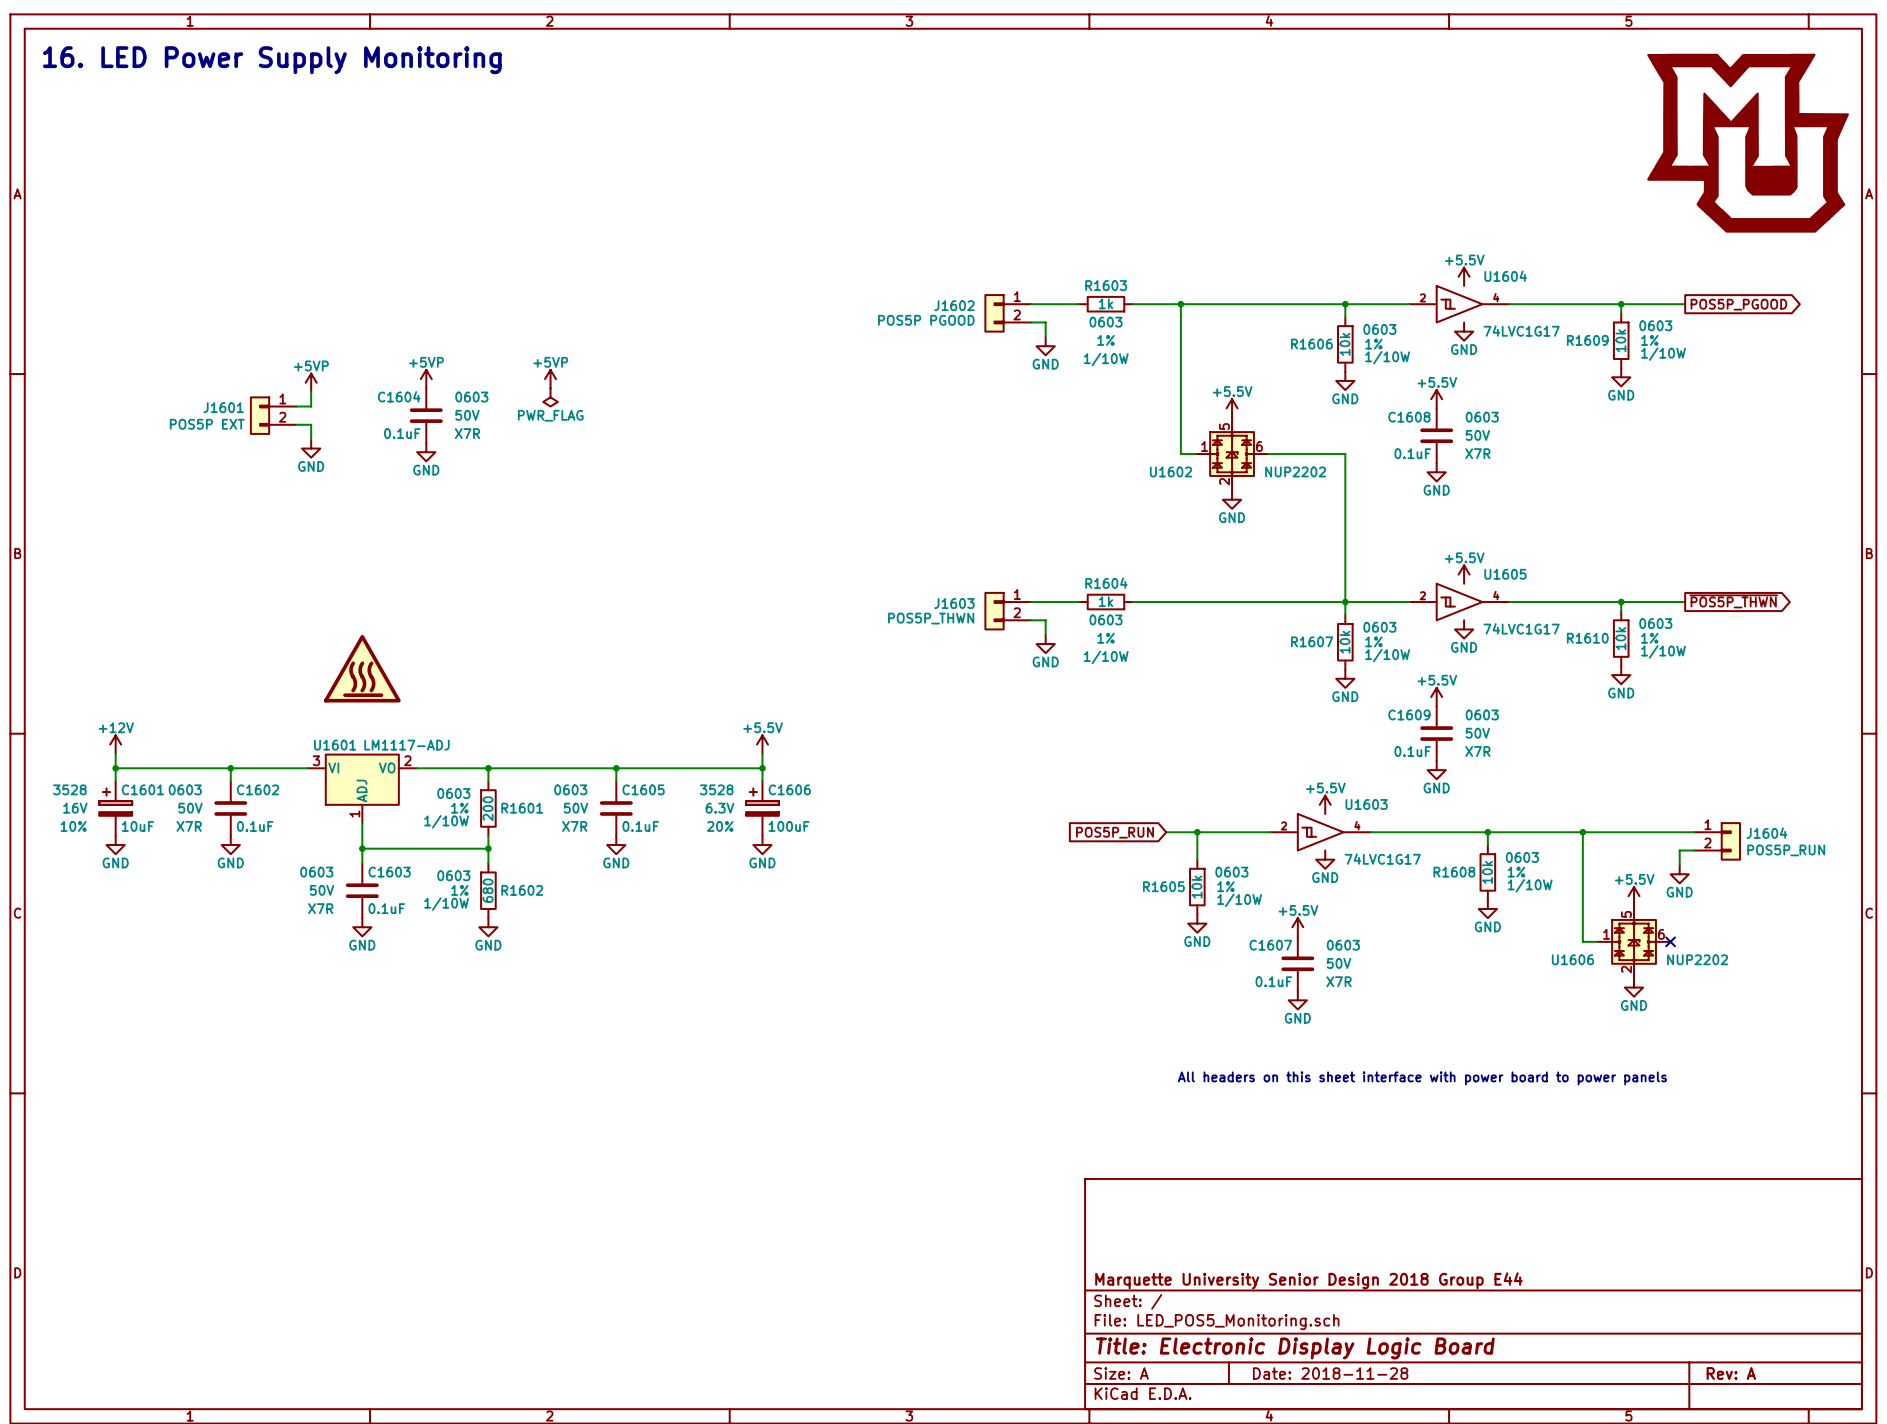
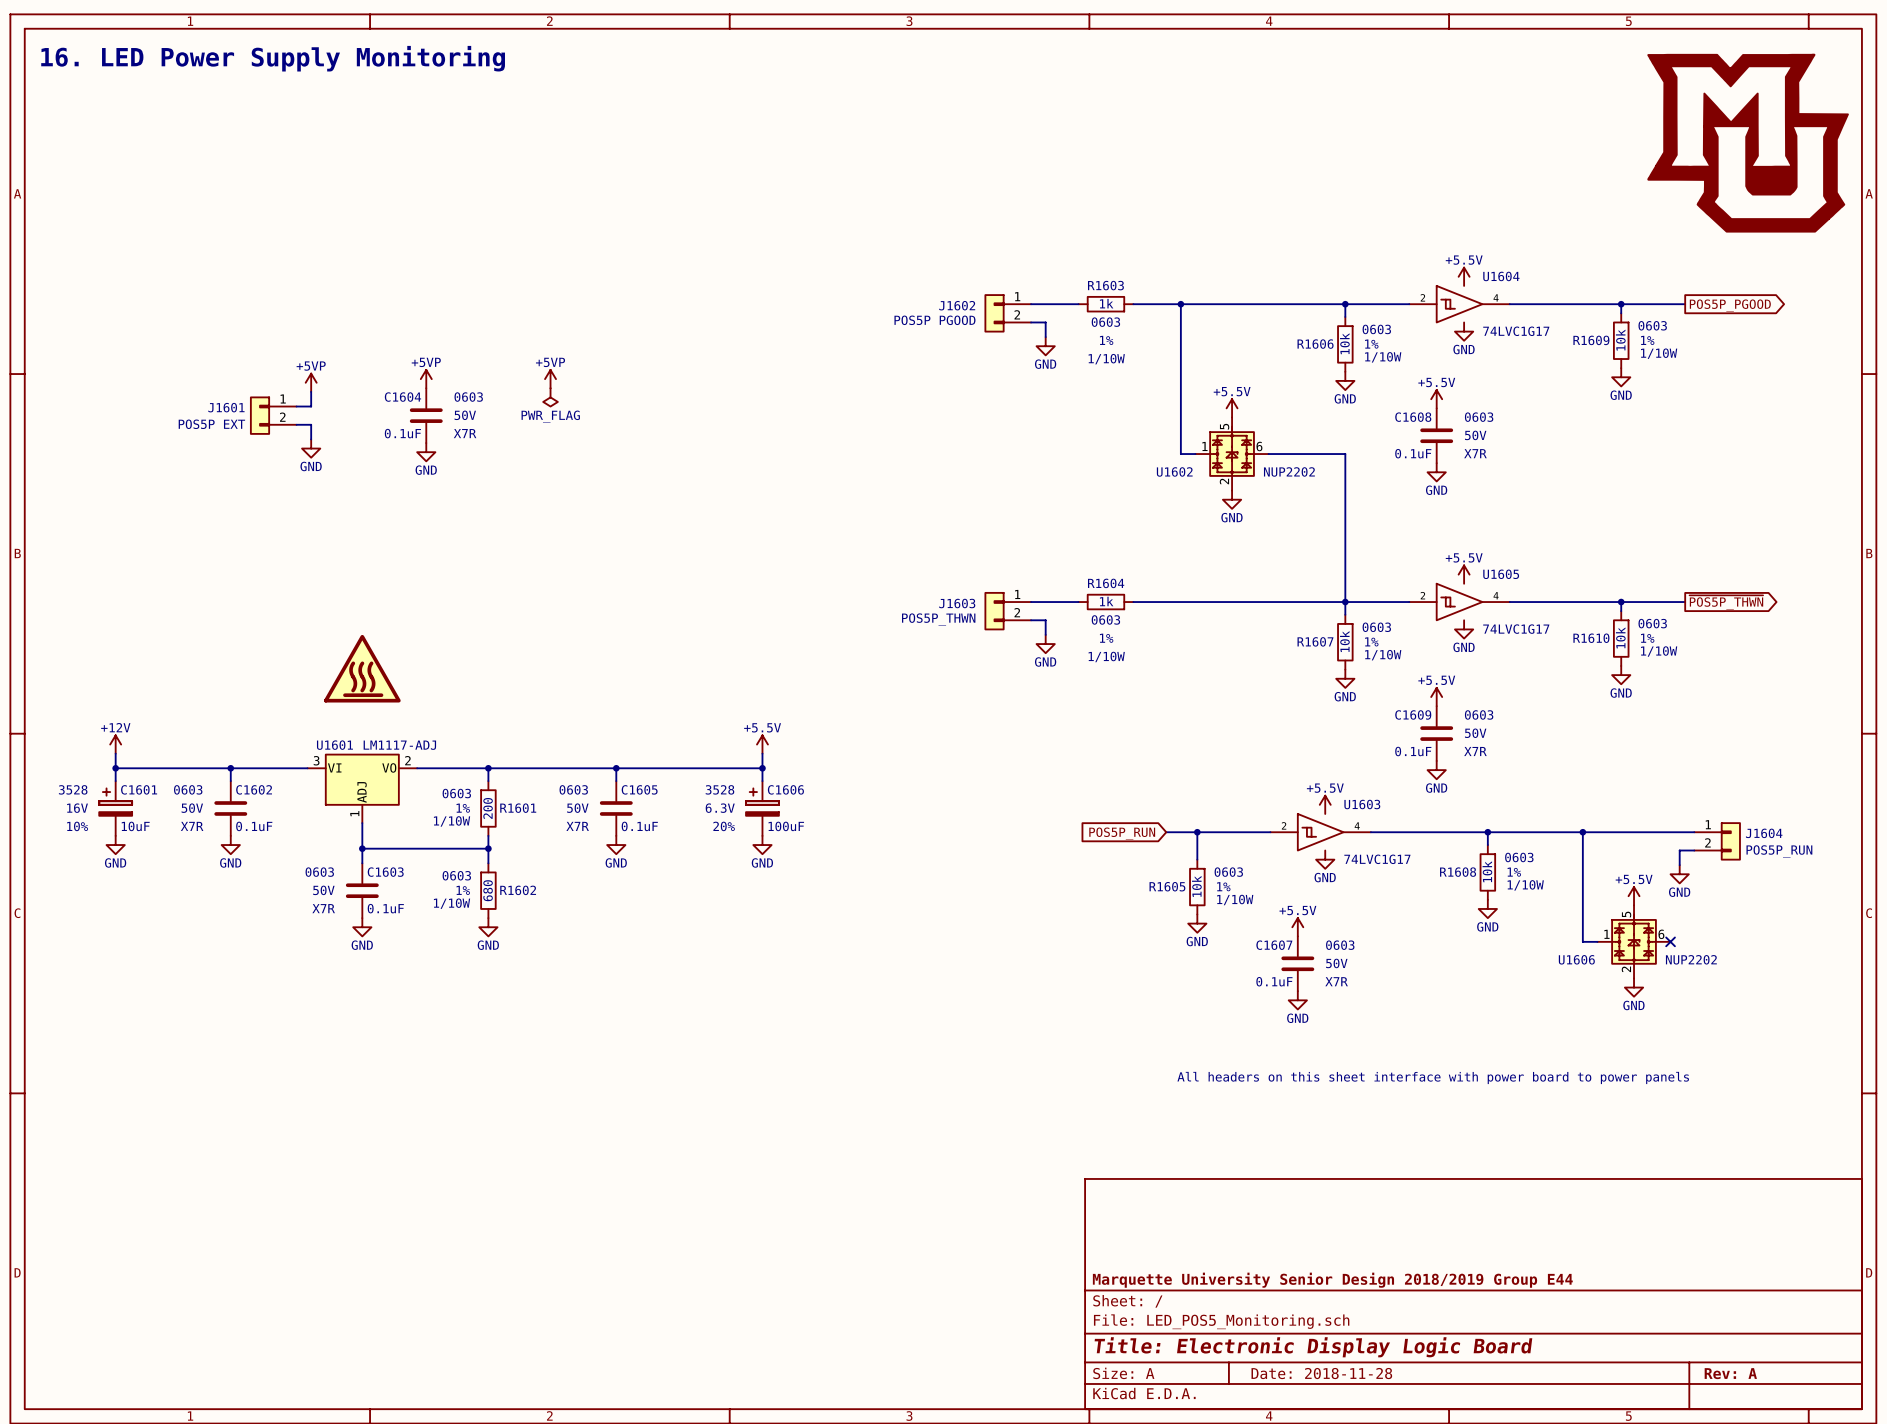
title block: Marquette University Senior Design 2018 Group E44 (1308, 1280) -> Marquette University Senior Design 2018/2019 Group E44 (1332, 1280)

